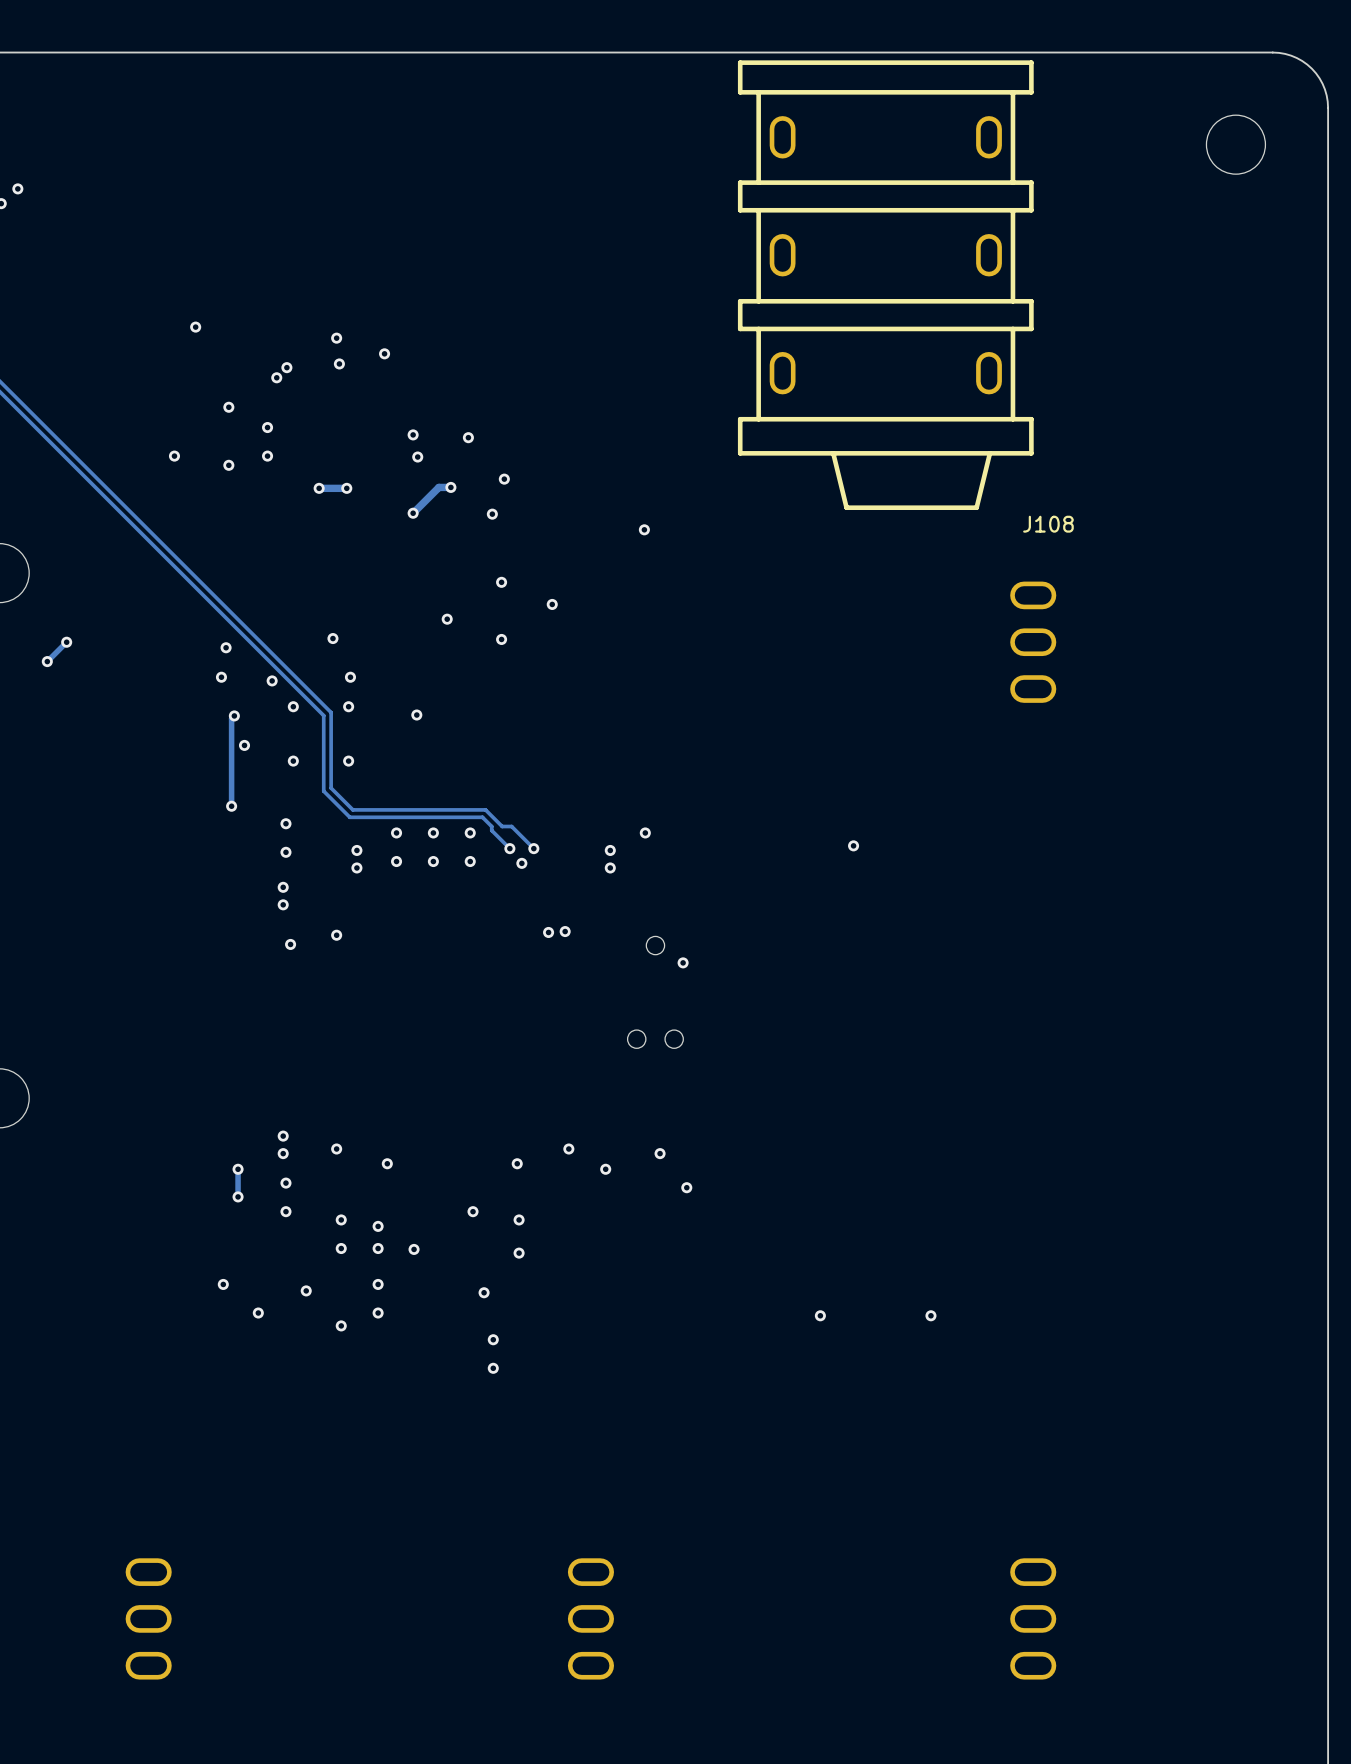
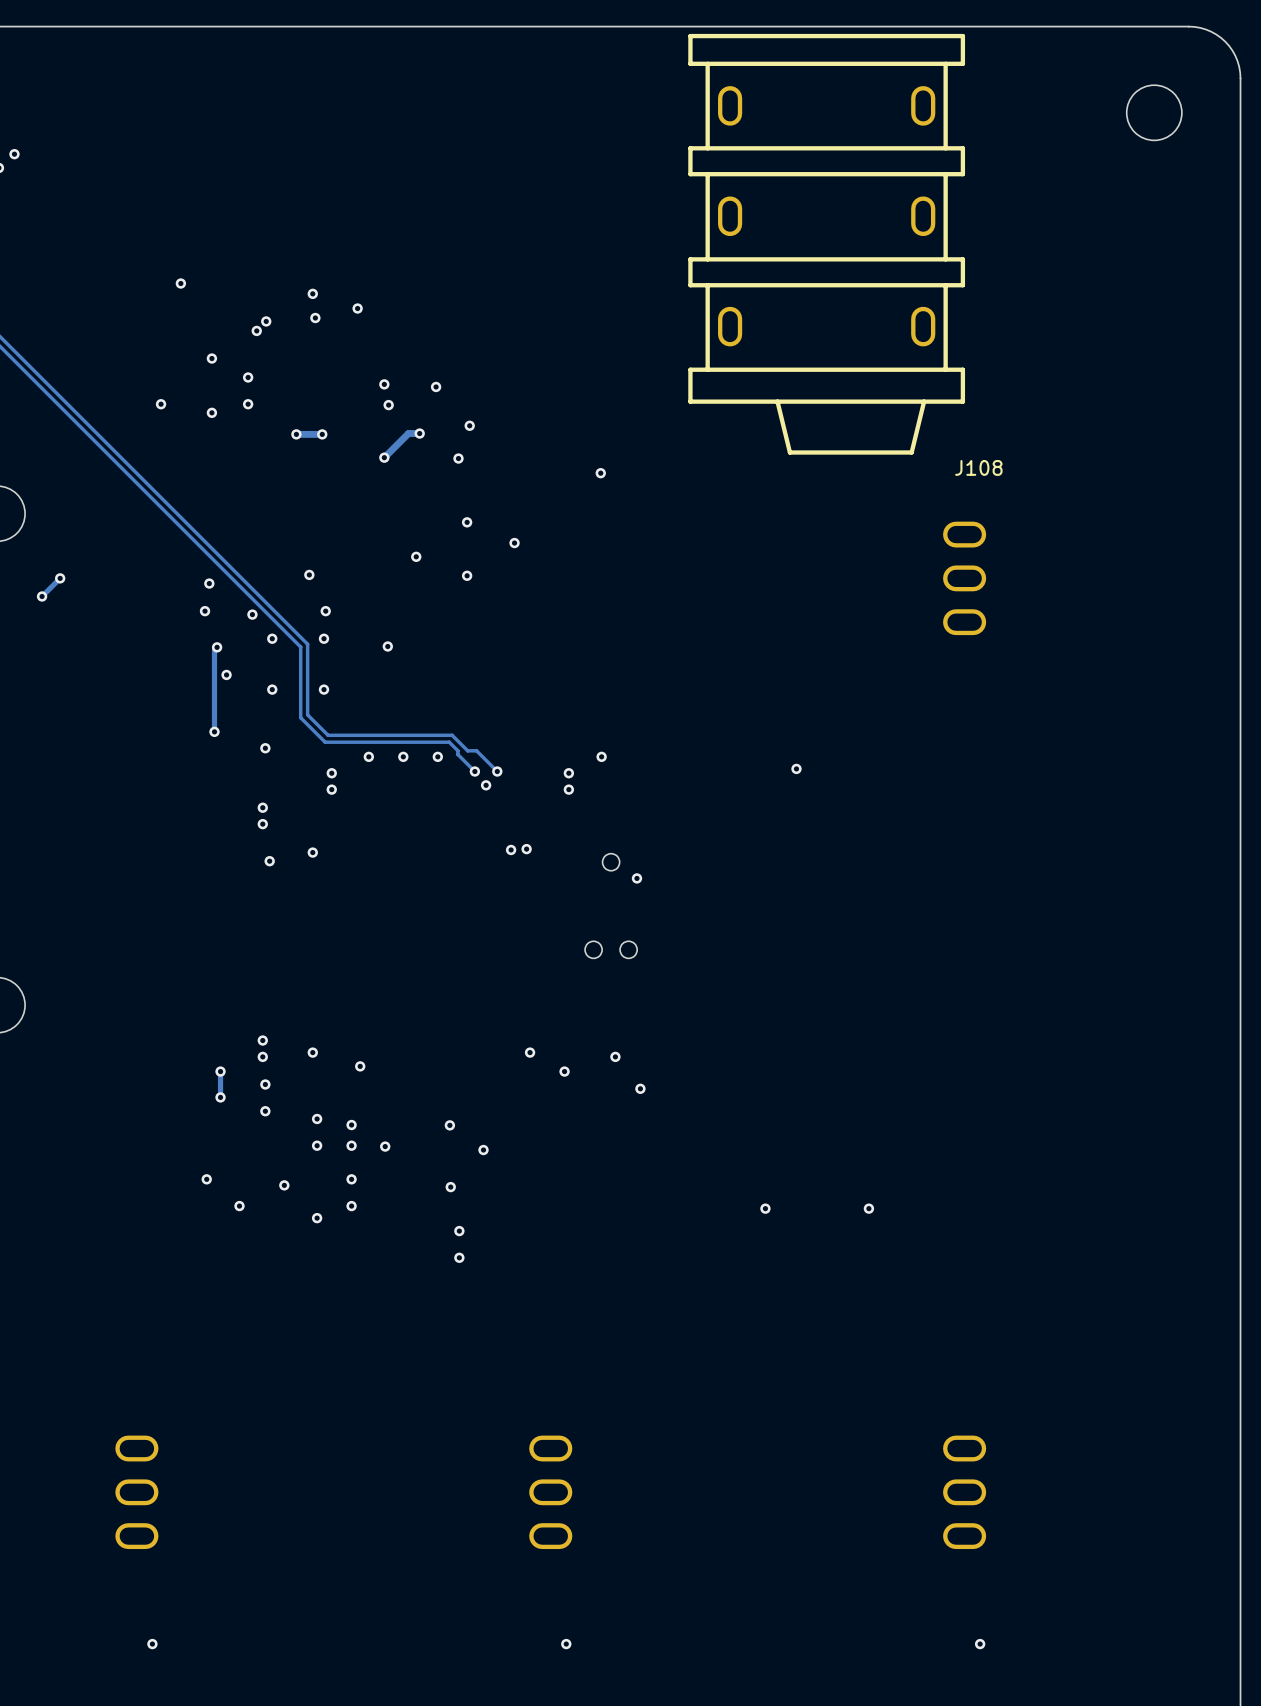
via: (285, 852) -> none
via: (396, 861) -> none
via: (433, 861) -> none
via: (470, 861) -> none
via: (517, 1163) -> none
via: (473, 1211) -> none
via: (519, 1219) -> none
via: none -> (449, 1125)

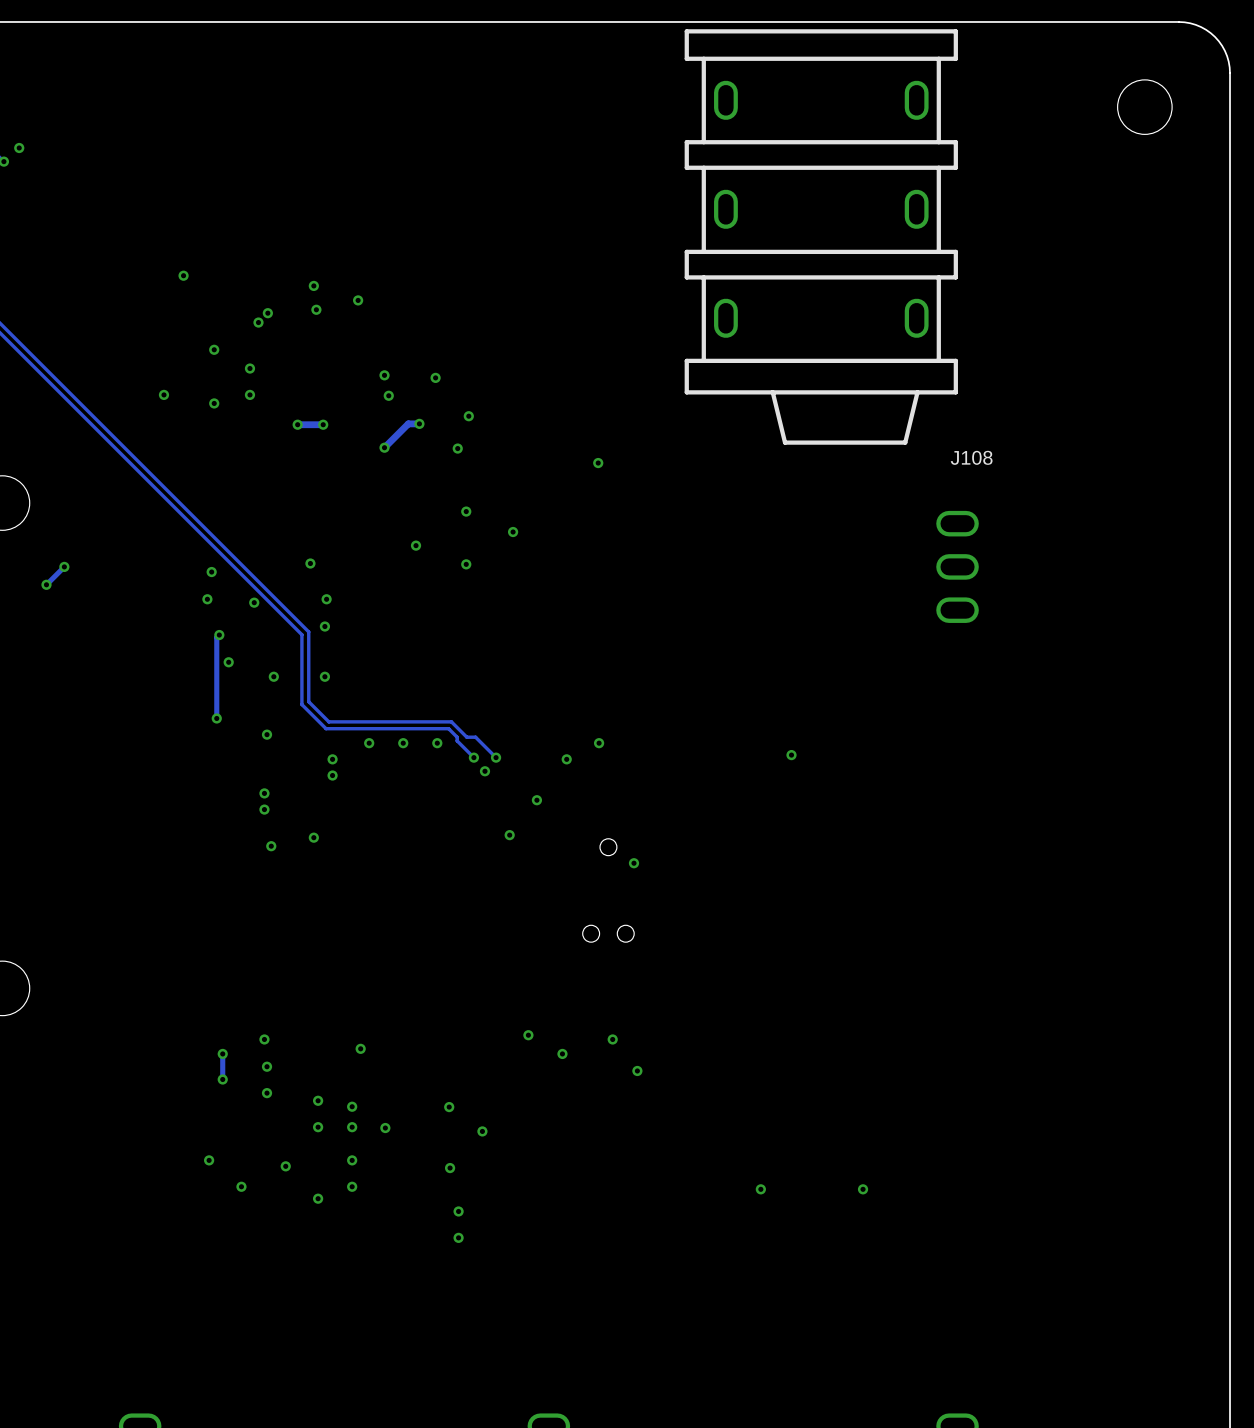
via: (272, 638) -> none
via: (387, 646) -> none
via: (568, 789) -> none
via: none -> (536, 800)
via: (526, 849) -> none
via: (262, 1040) -> none
via: (312, 1052) -> none

